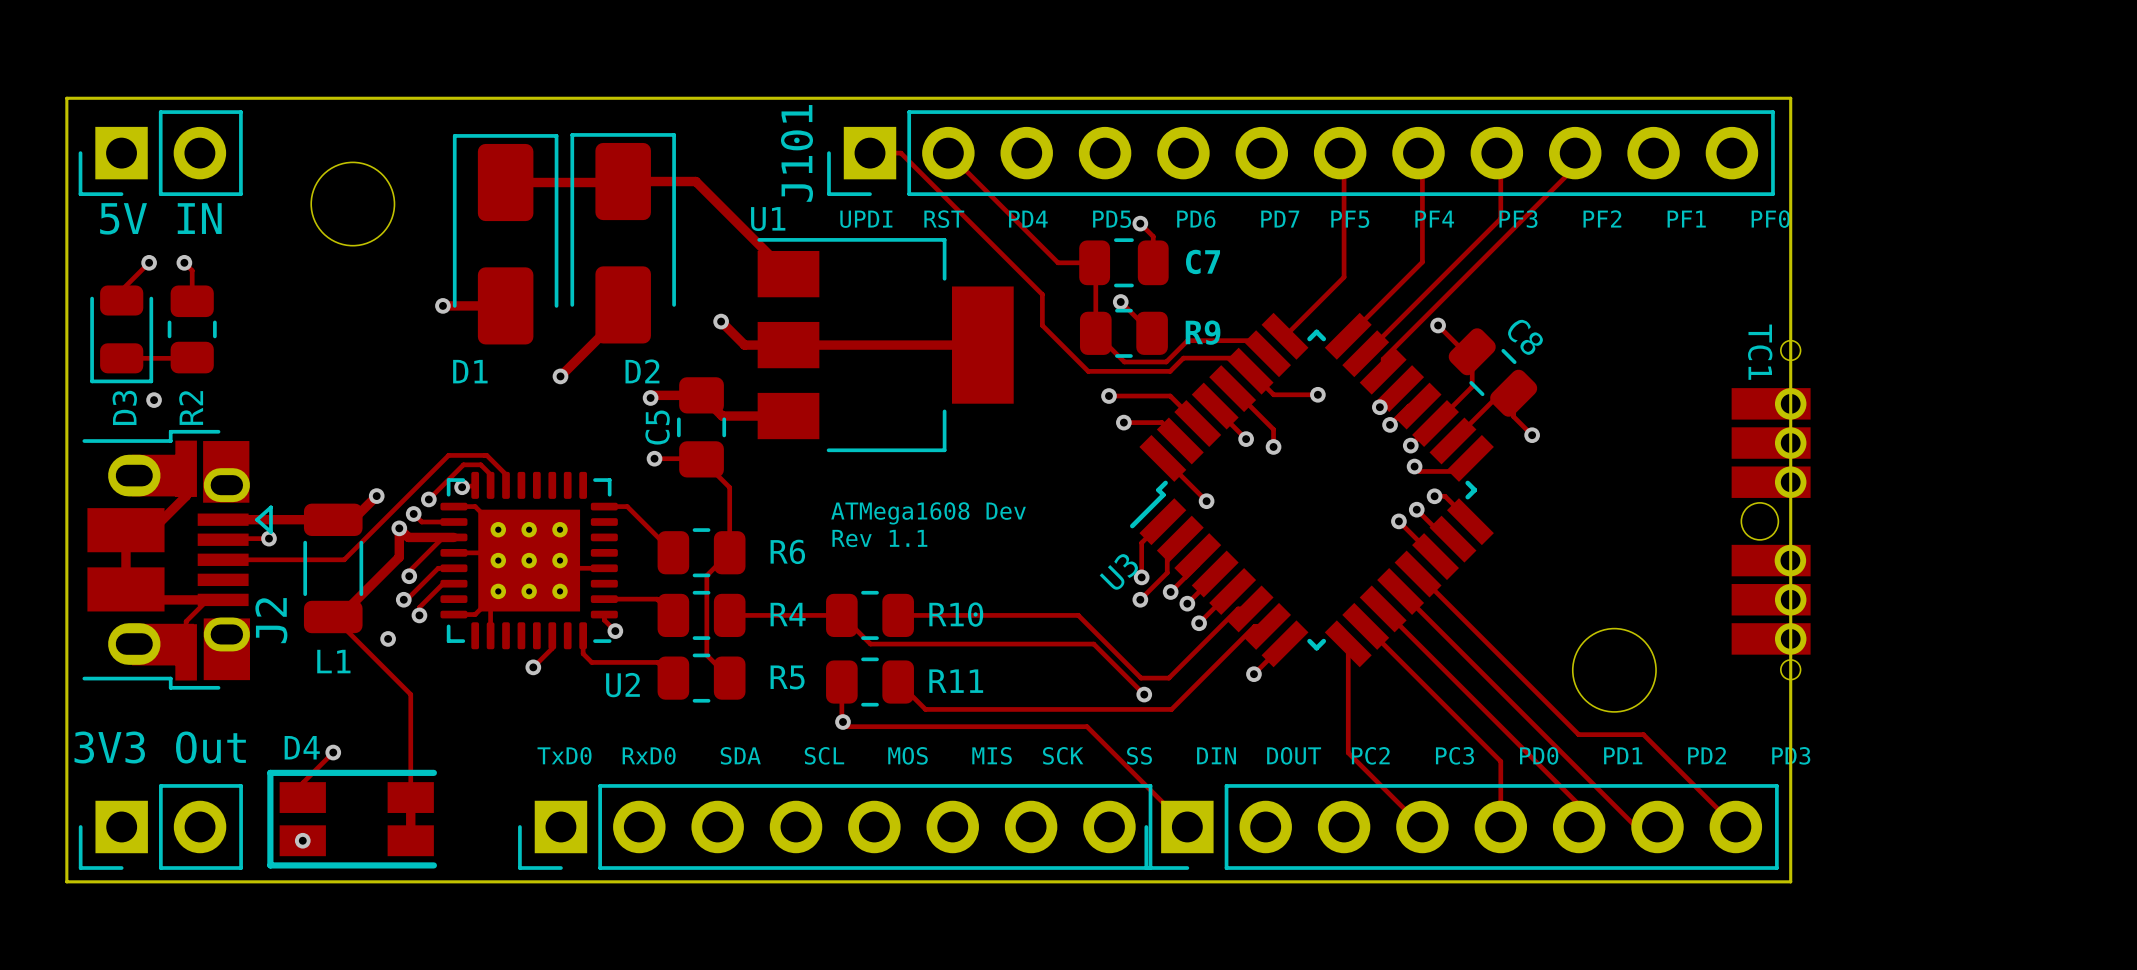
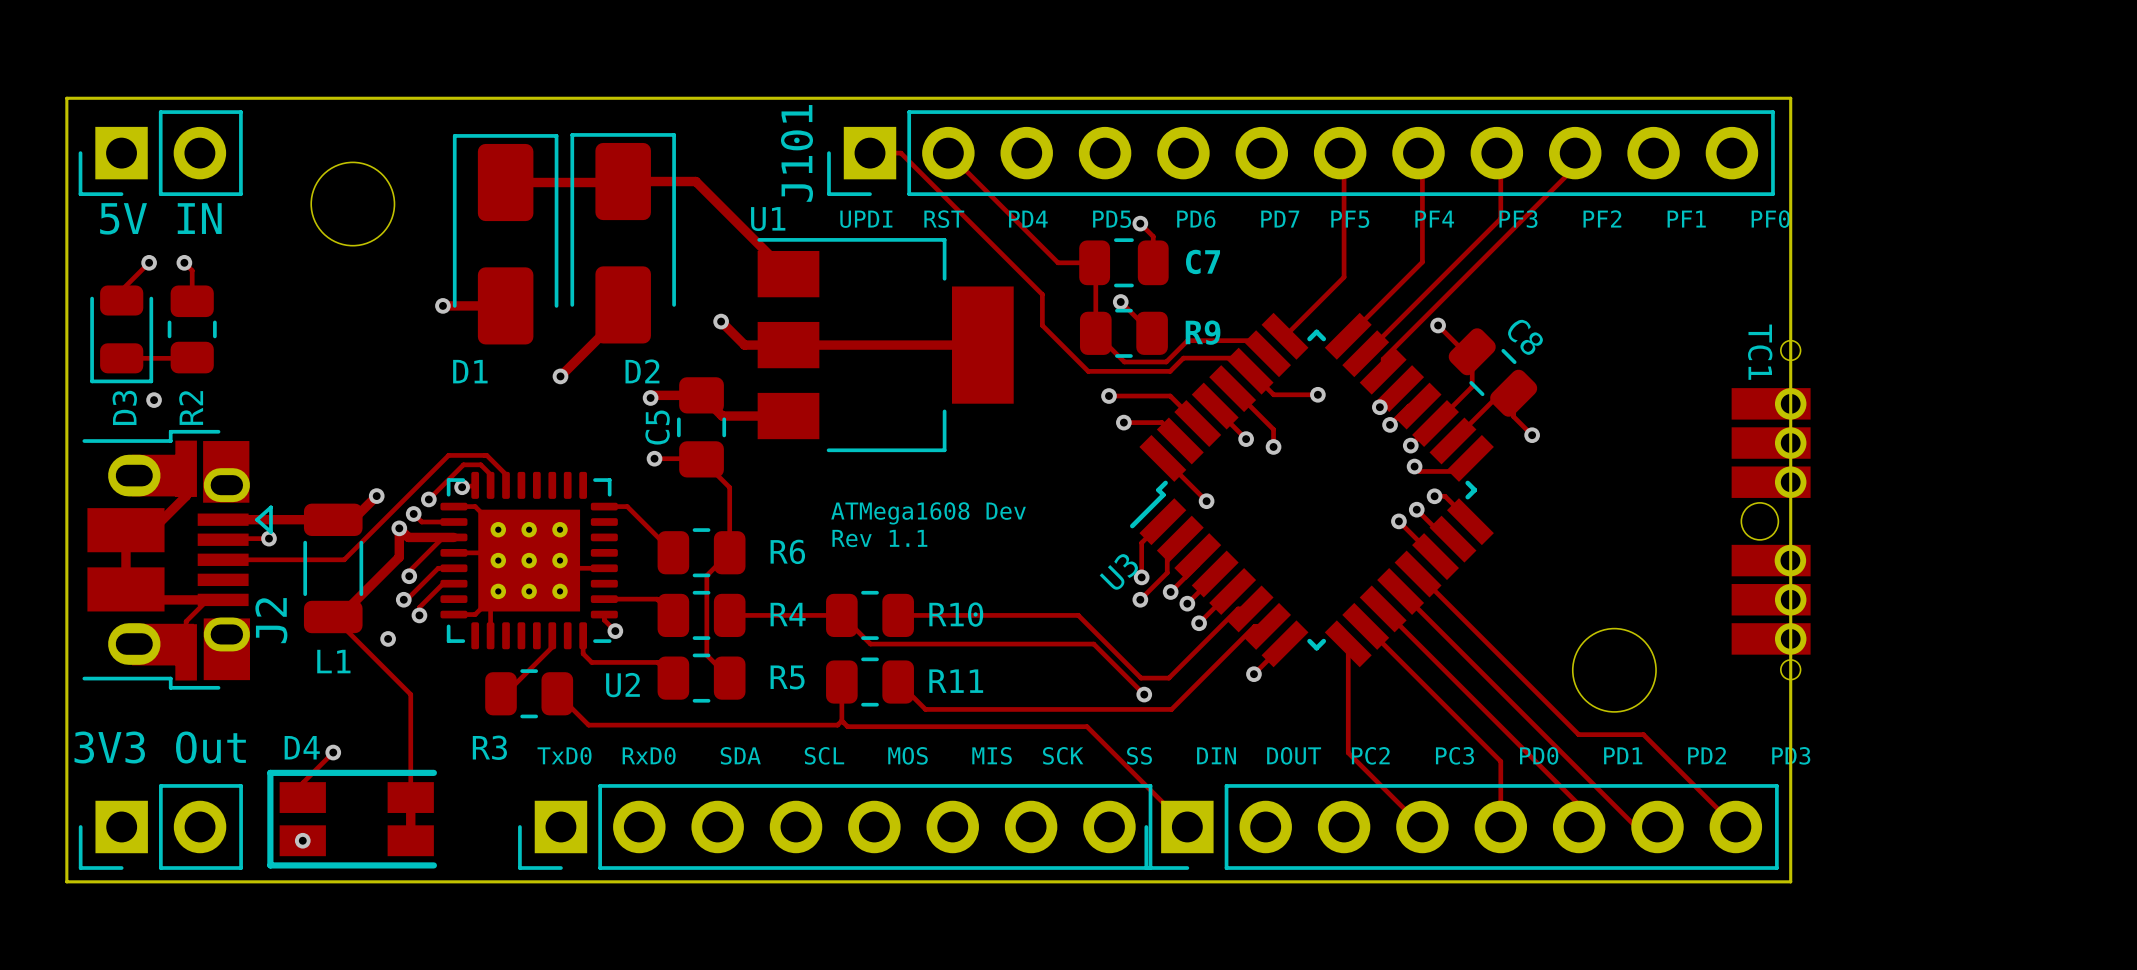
track: (552, 647) (533, 667) -> (552, 647) (505, 693) (501, 693)
via: (533, 667) -> none
R3: none -> (529, 693)
track: none -> (557, 693) (588, 725) (837, 725) (841, 720)
via: (842, 722) -> none

